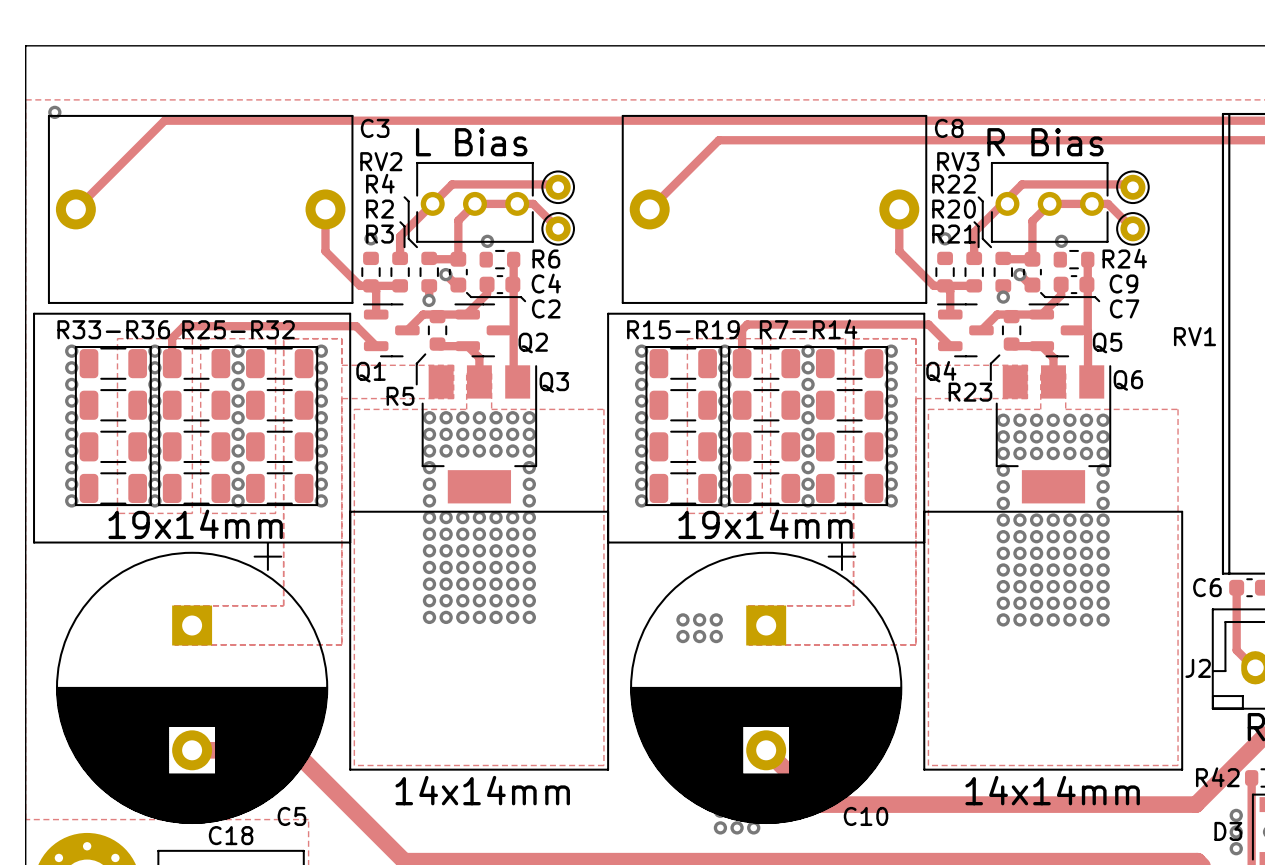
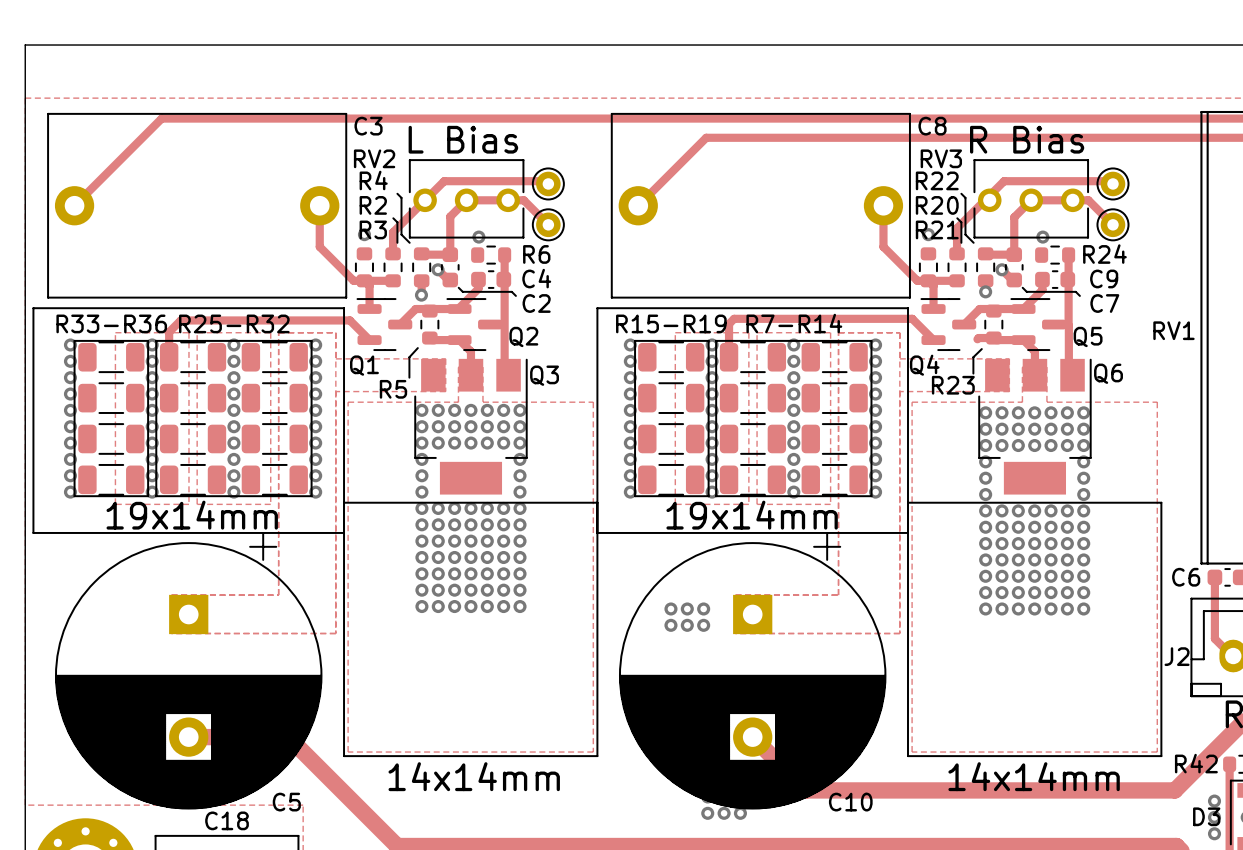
via: (54, 112) -> none
track: none -> (993, 338) (977, 339)

